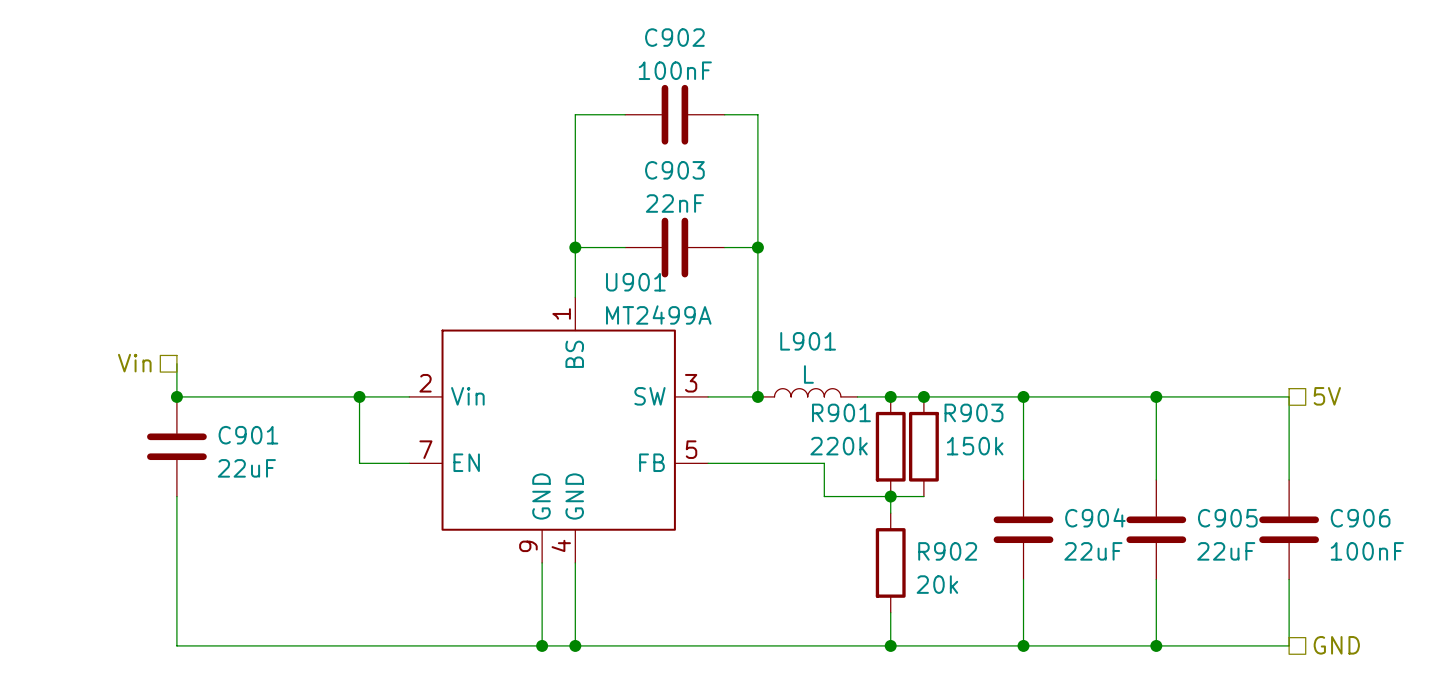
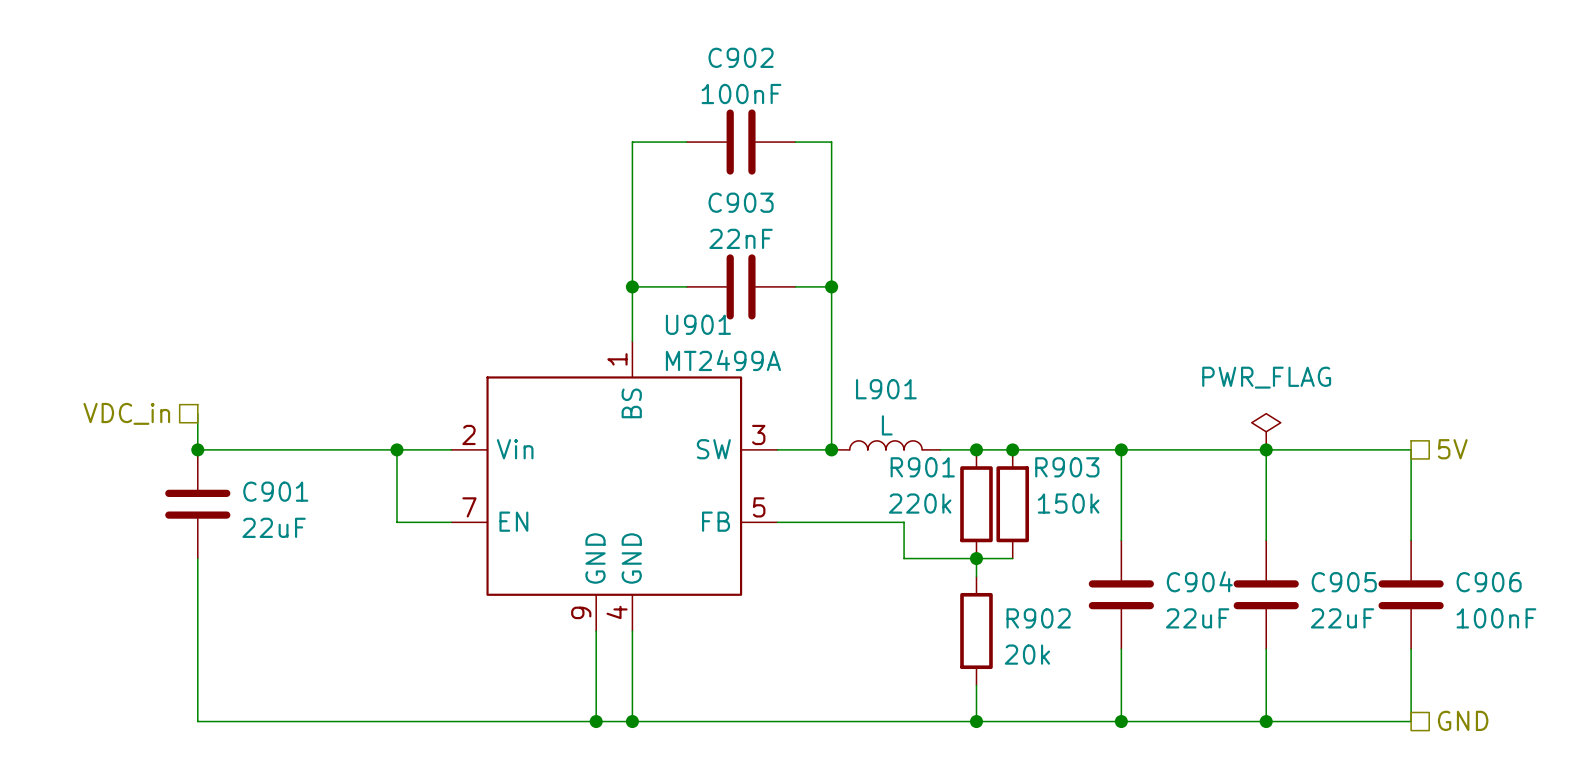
hierarchical label: Vin (134, 363) -> VDC_in (126, 413)
power symbol: none -> PWR_FLAG (1266, 431)

